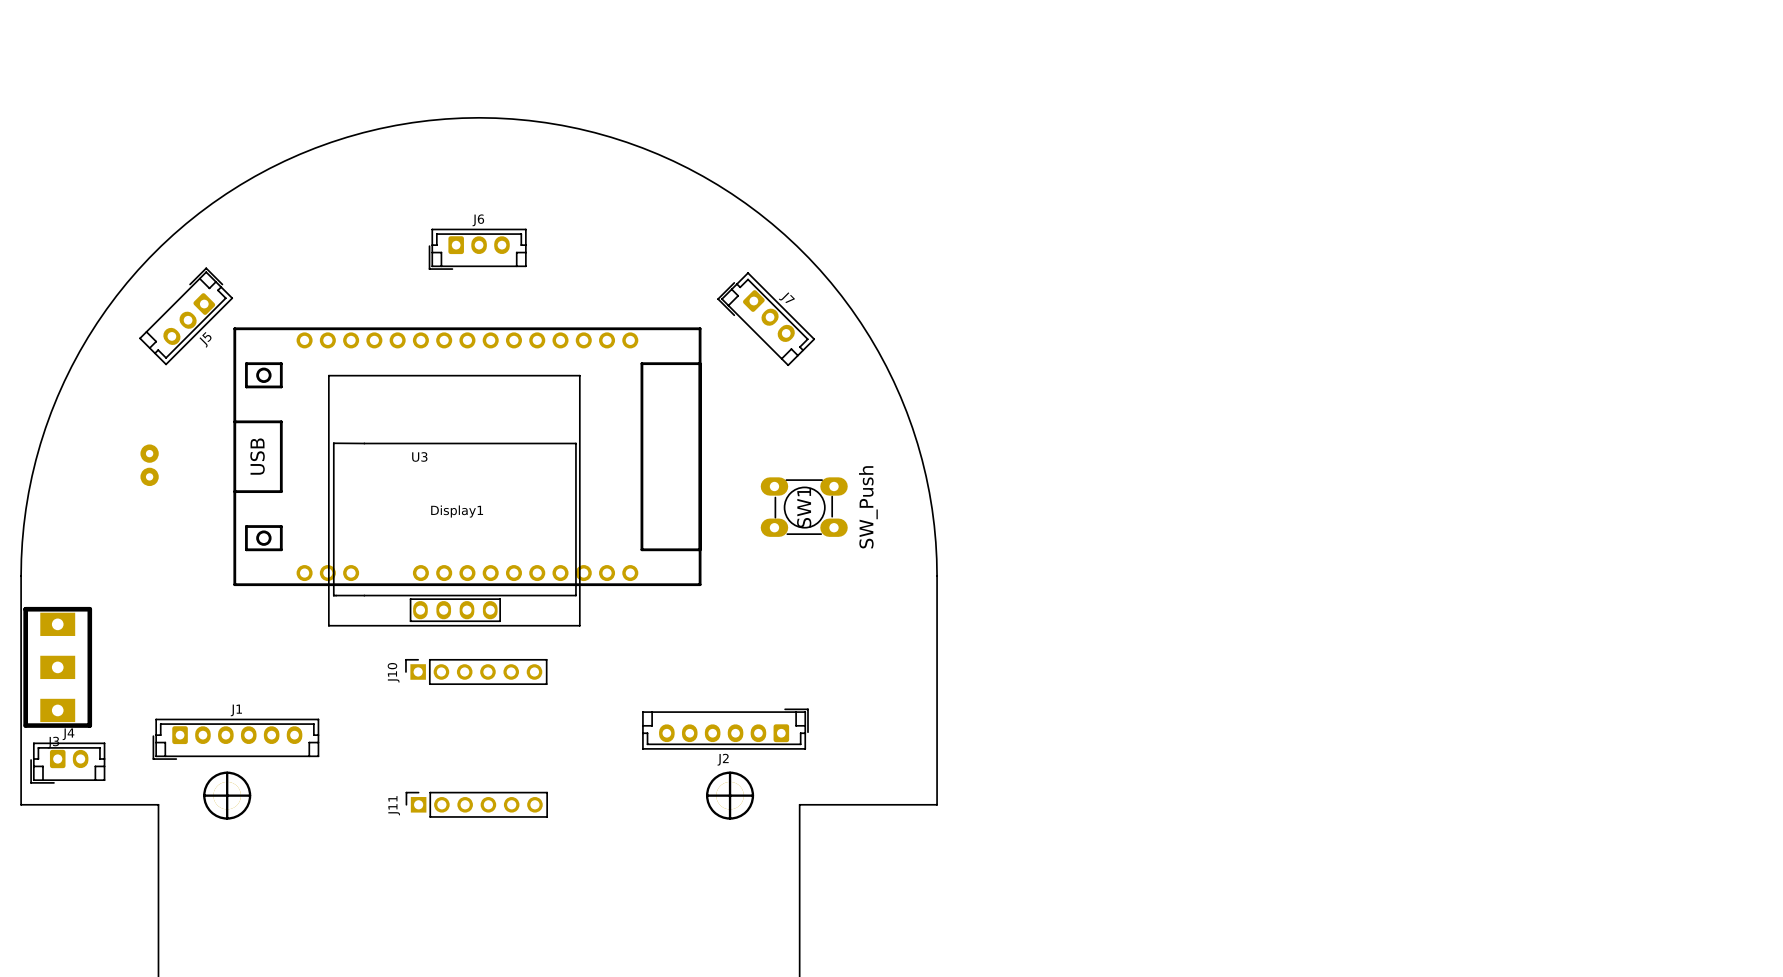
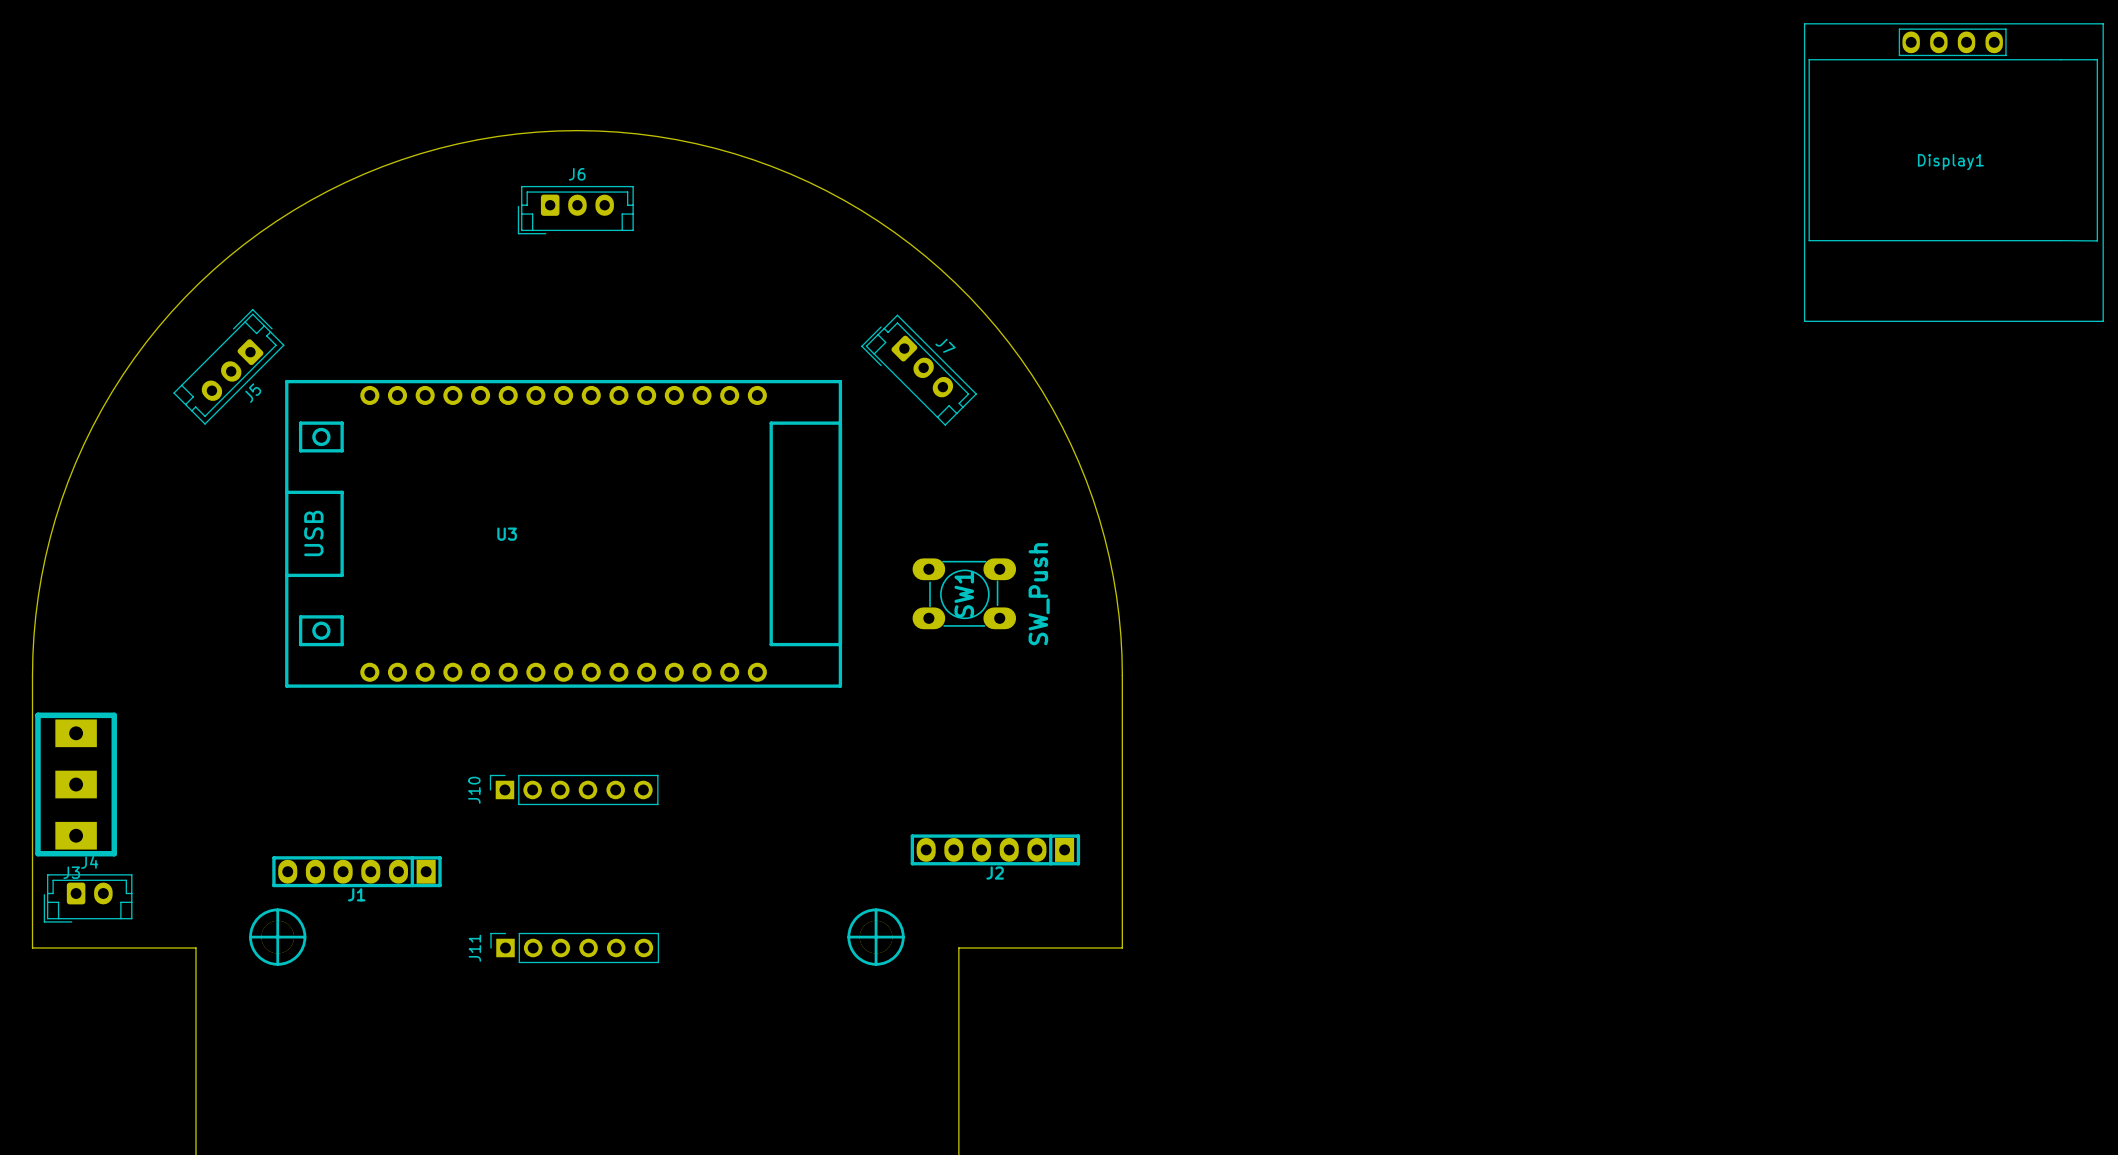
J6 position: (477, 249) -> (575, 210)
U3 footprint: [233, 327, 702, 587] -> [285, 379, 843, 688]
part: (149, 465) -> none
Display1 rotation: 0° (454, 500) -> 180° (1953, 172)
Display1 position: (454, 500) -> (1953, 172)
J2 footprint: [642, 708, 809, 750] -> [910, 834, 1081, 866]
J1 name position: J1 (236, 710) -> J1 (356, 894)
J1 footprint: [152, 718, 320, 760] -> [272, 856, 442, 888]

